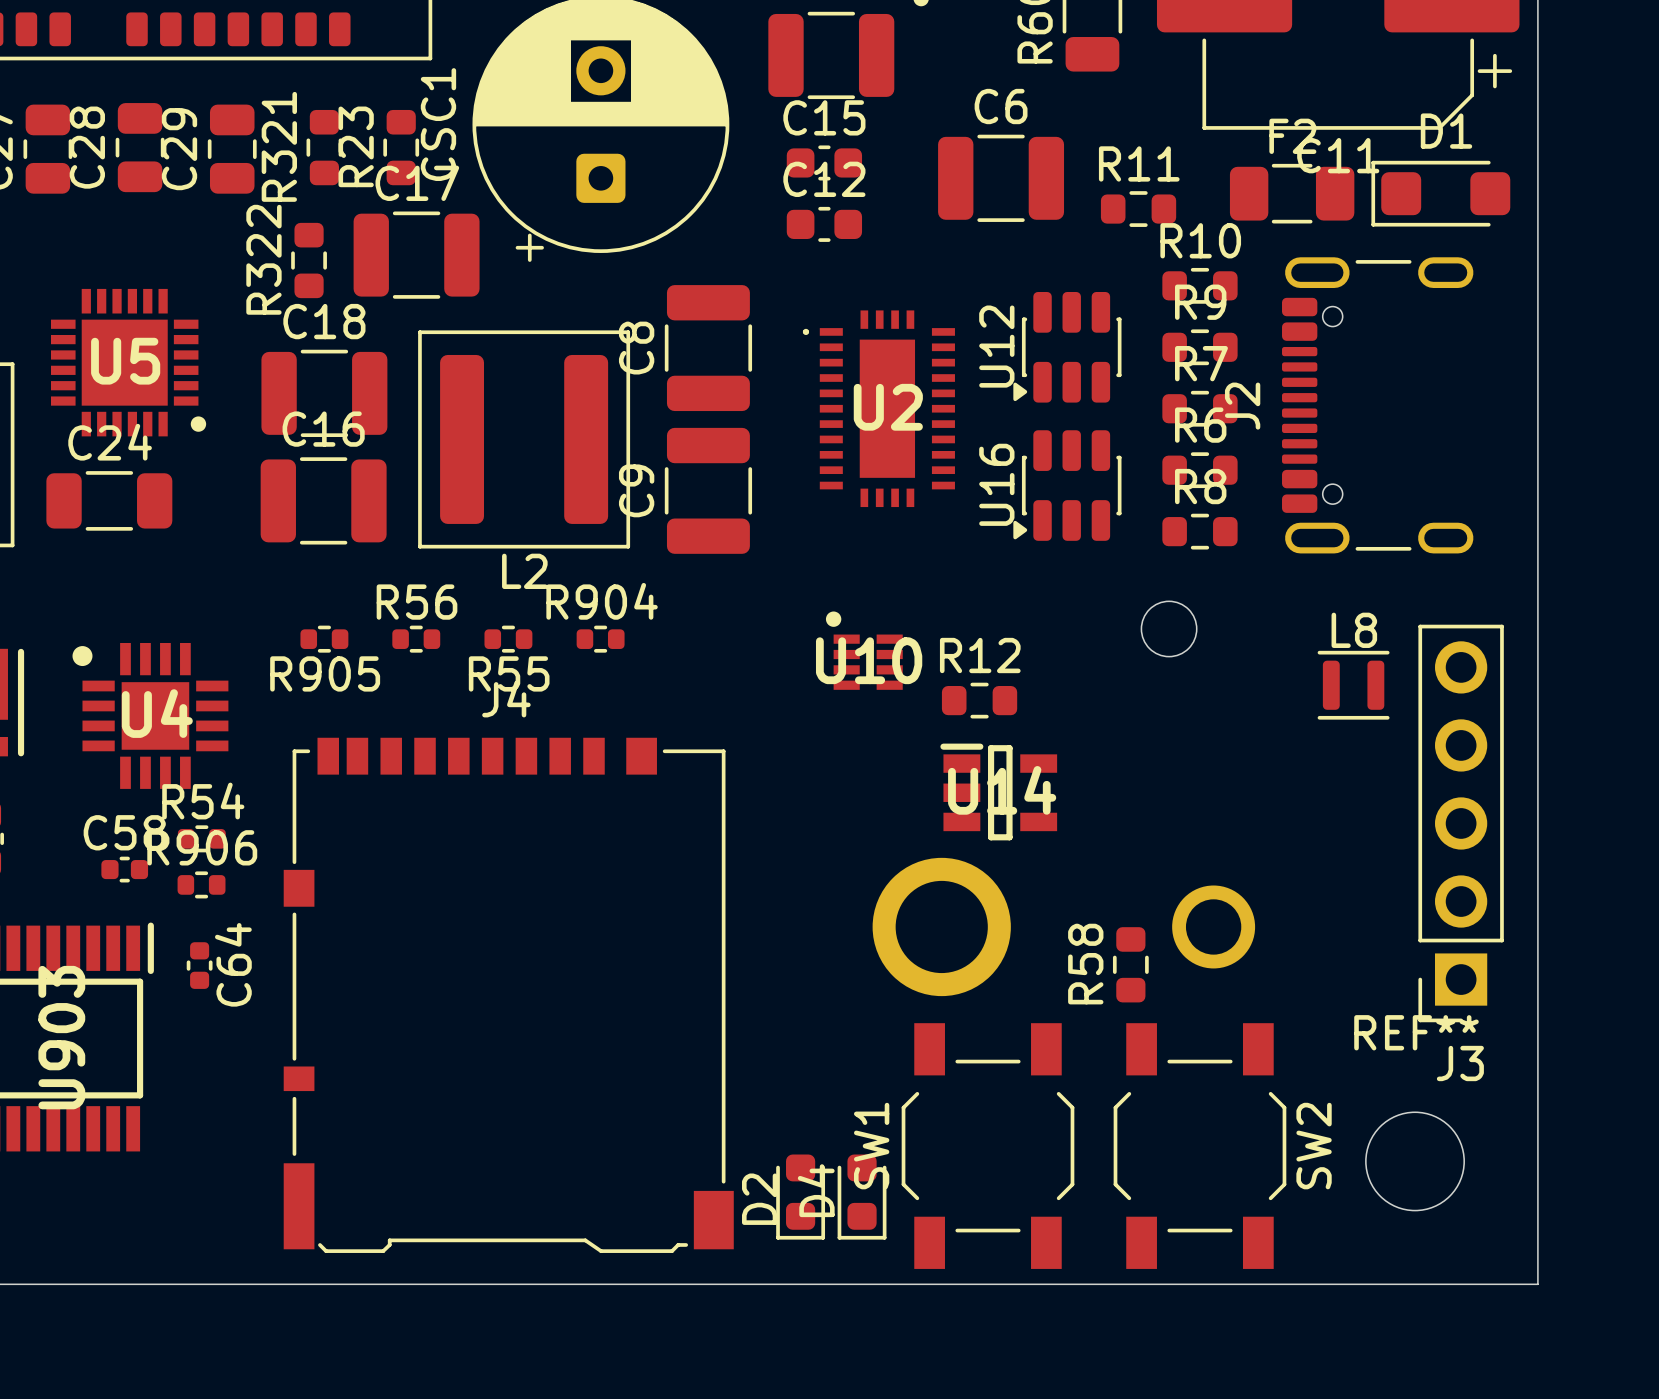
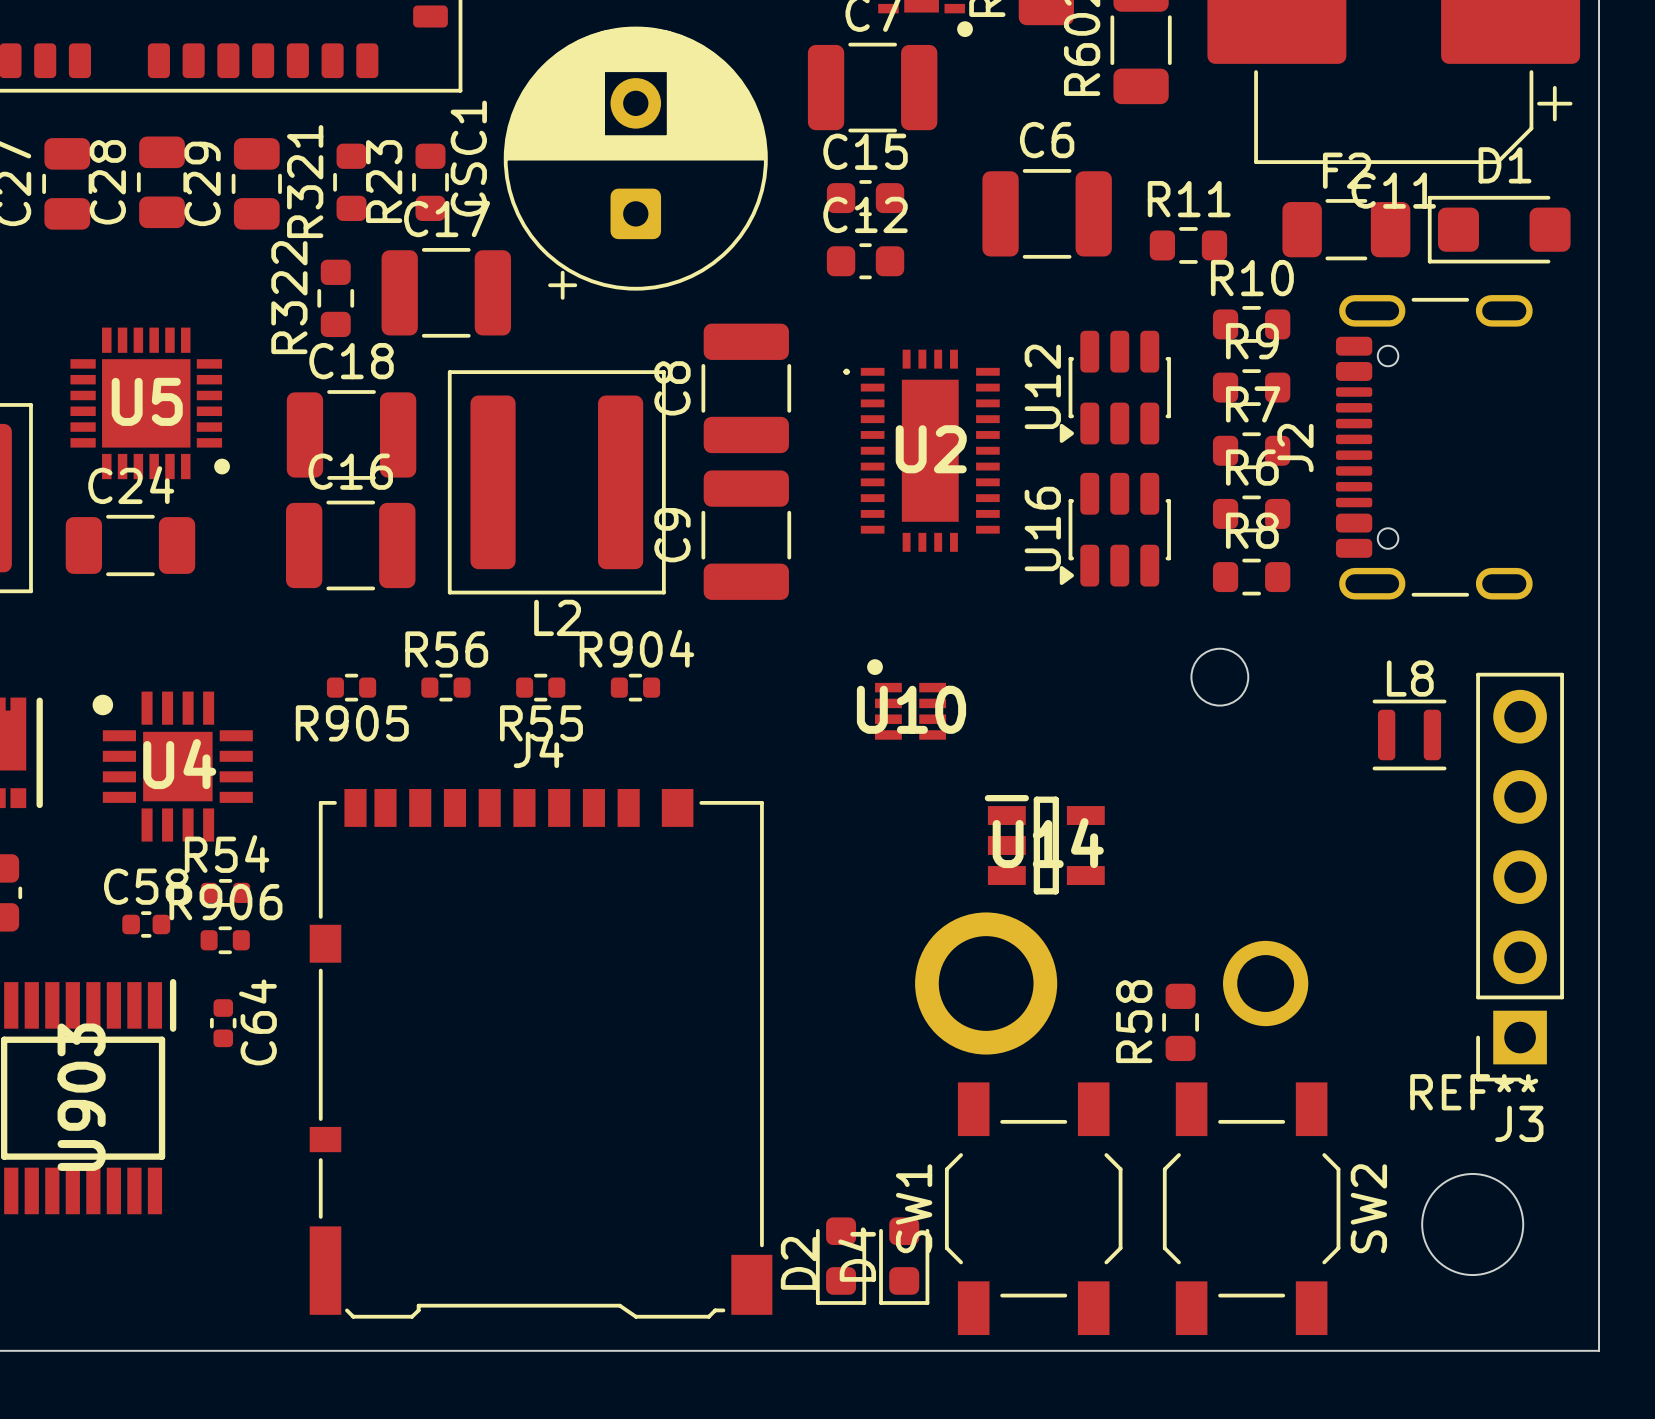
R12: (979, 700) -> none

